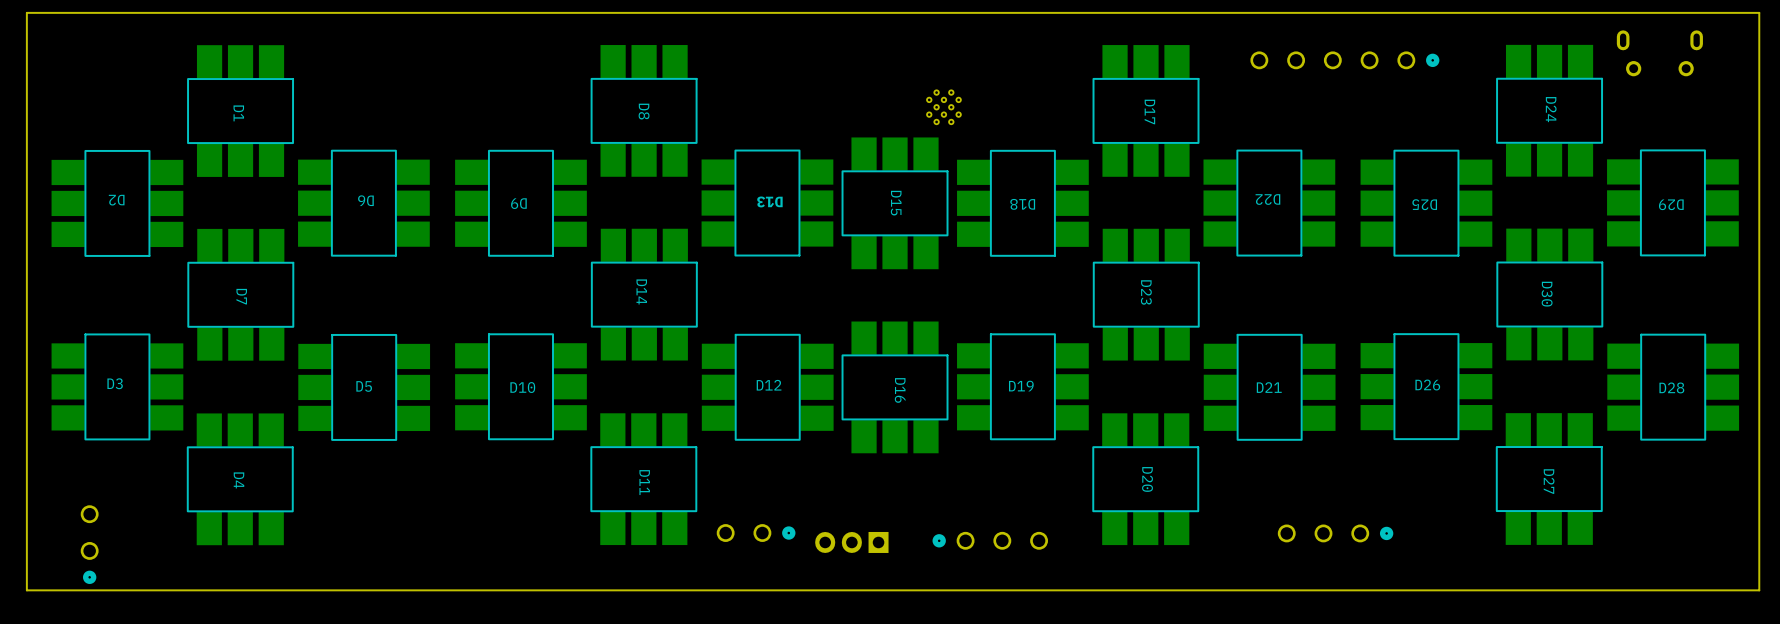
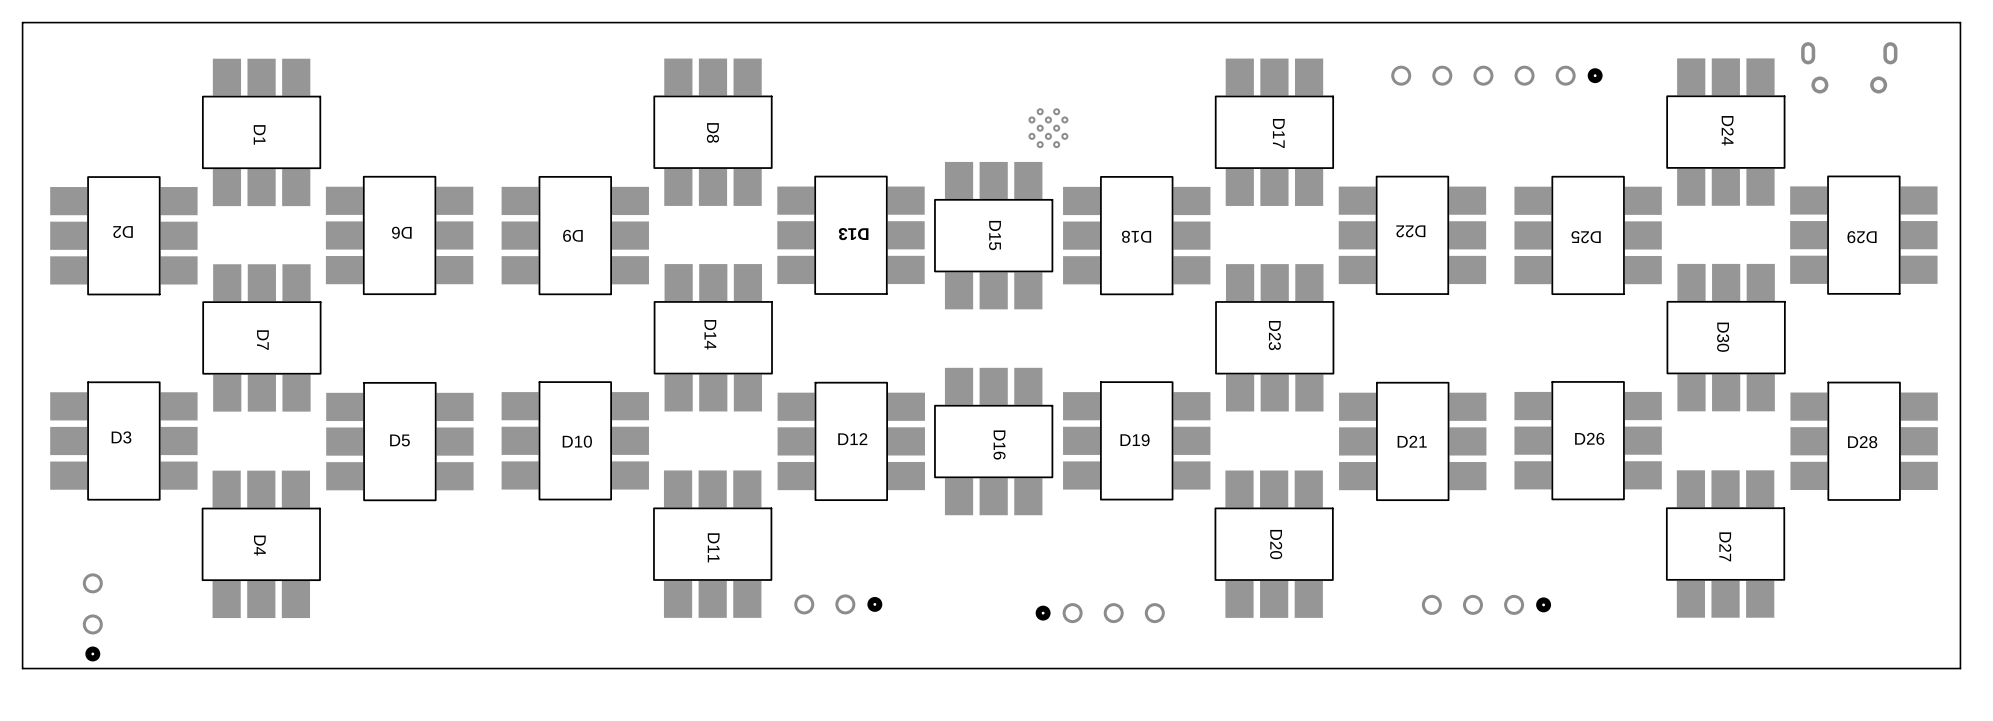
part: (851, 542) -> none

